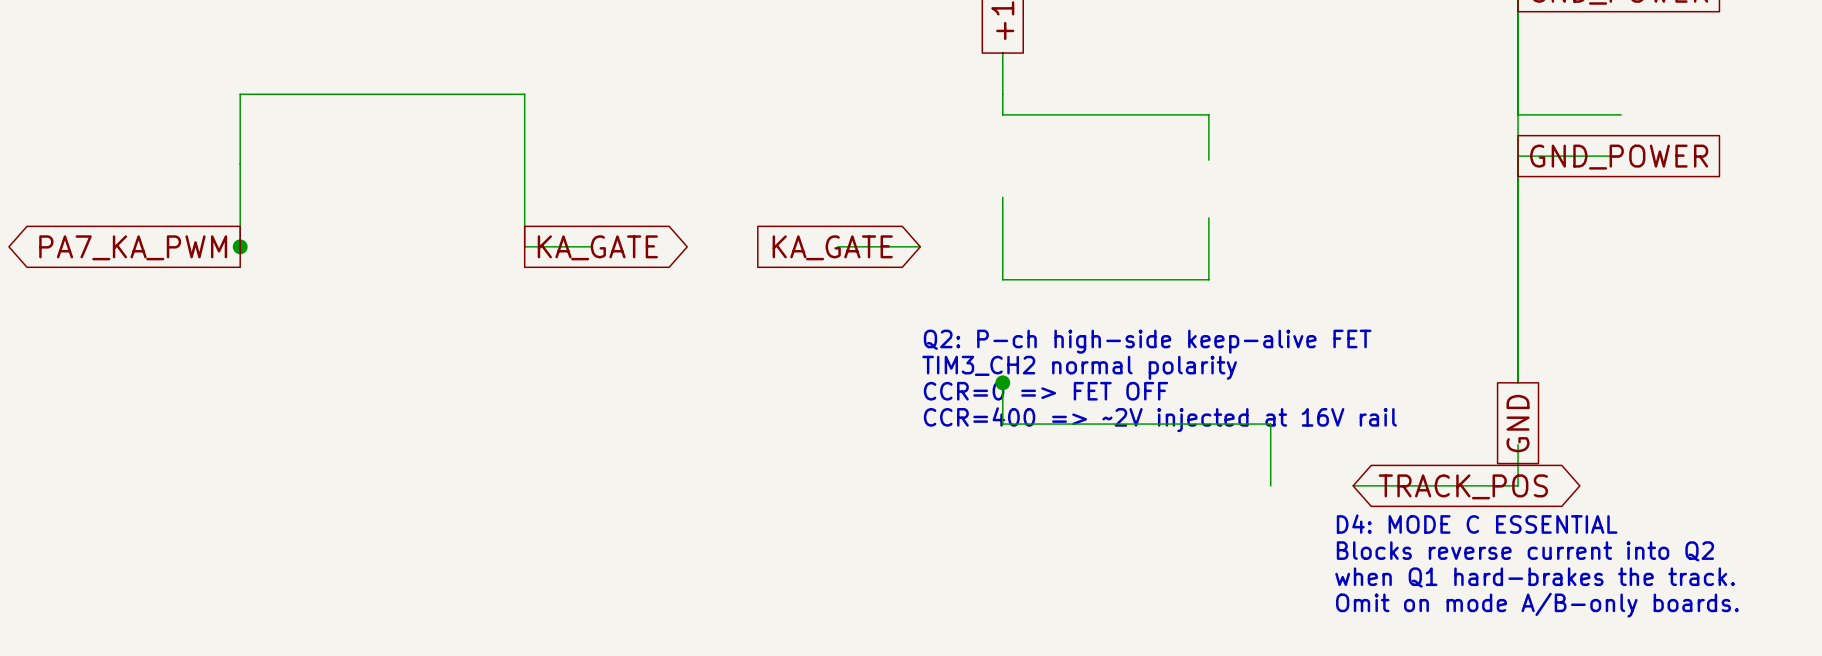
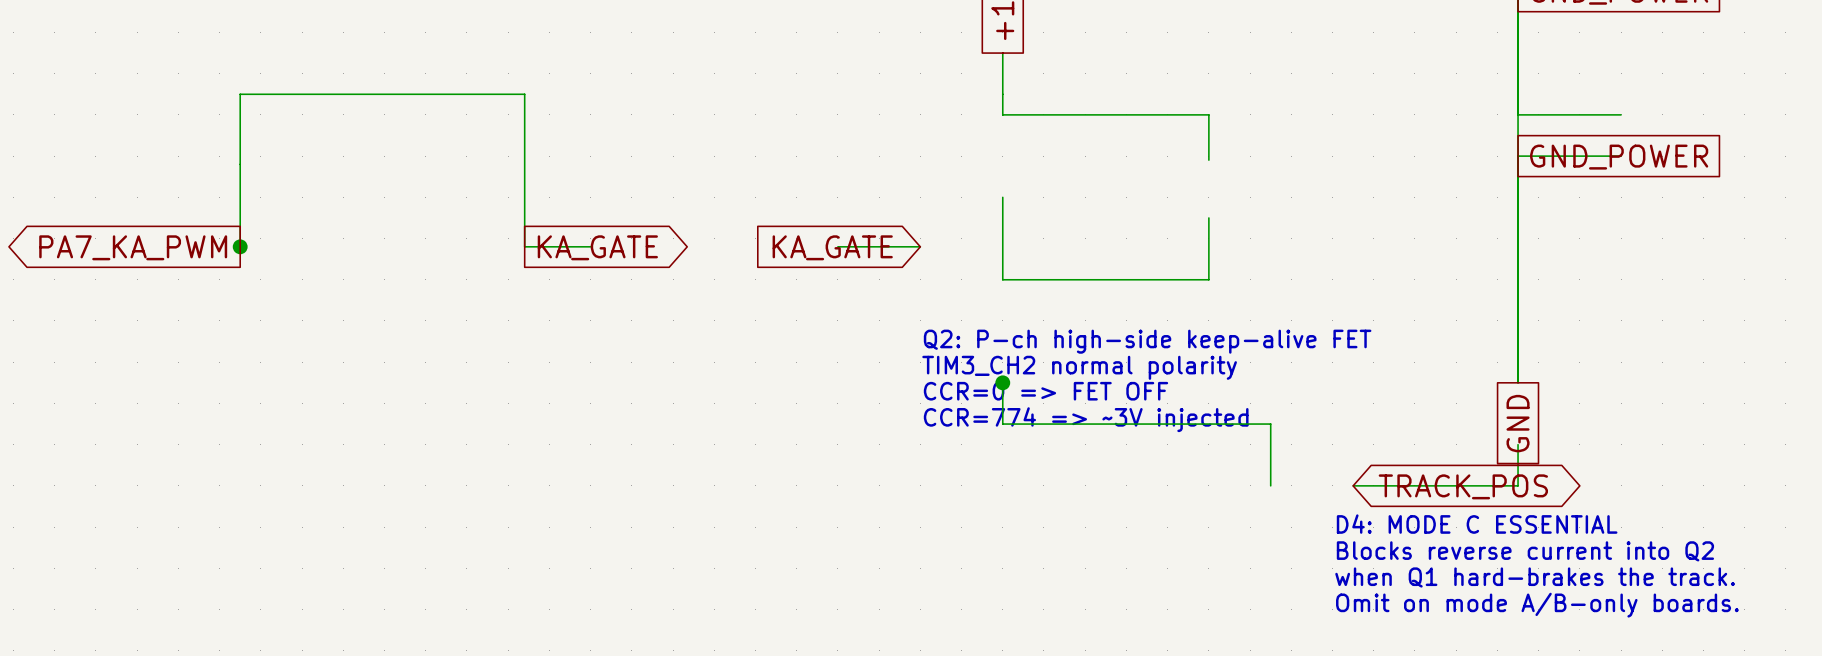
text: CCR=400 => ~2V injected at 16V rail (1160, 419) -> CCR=774 => ~3V injected (1086, 419)

